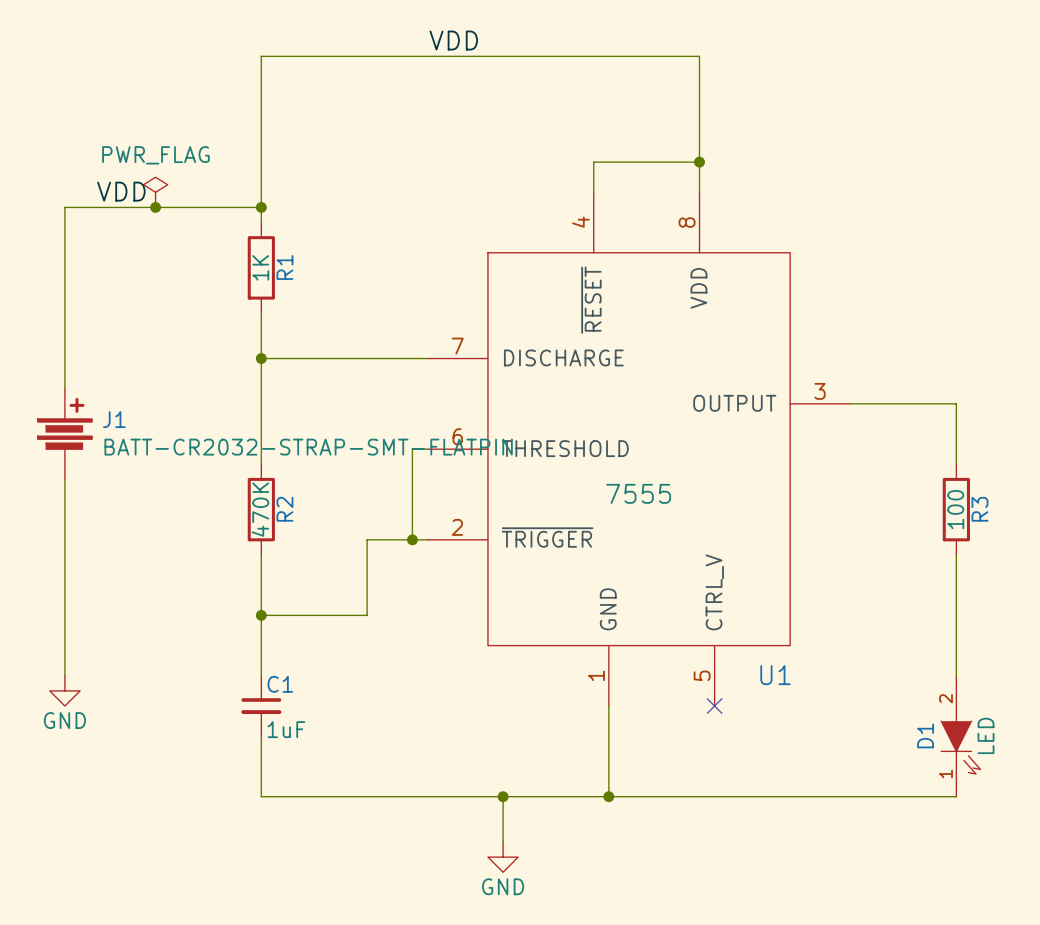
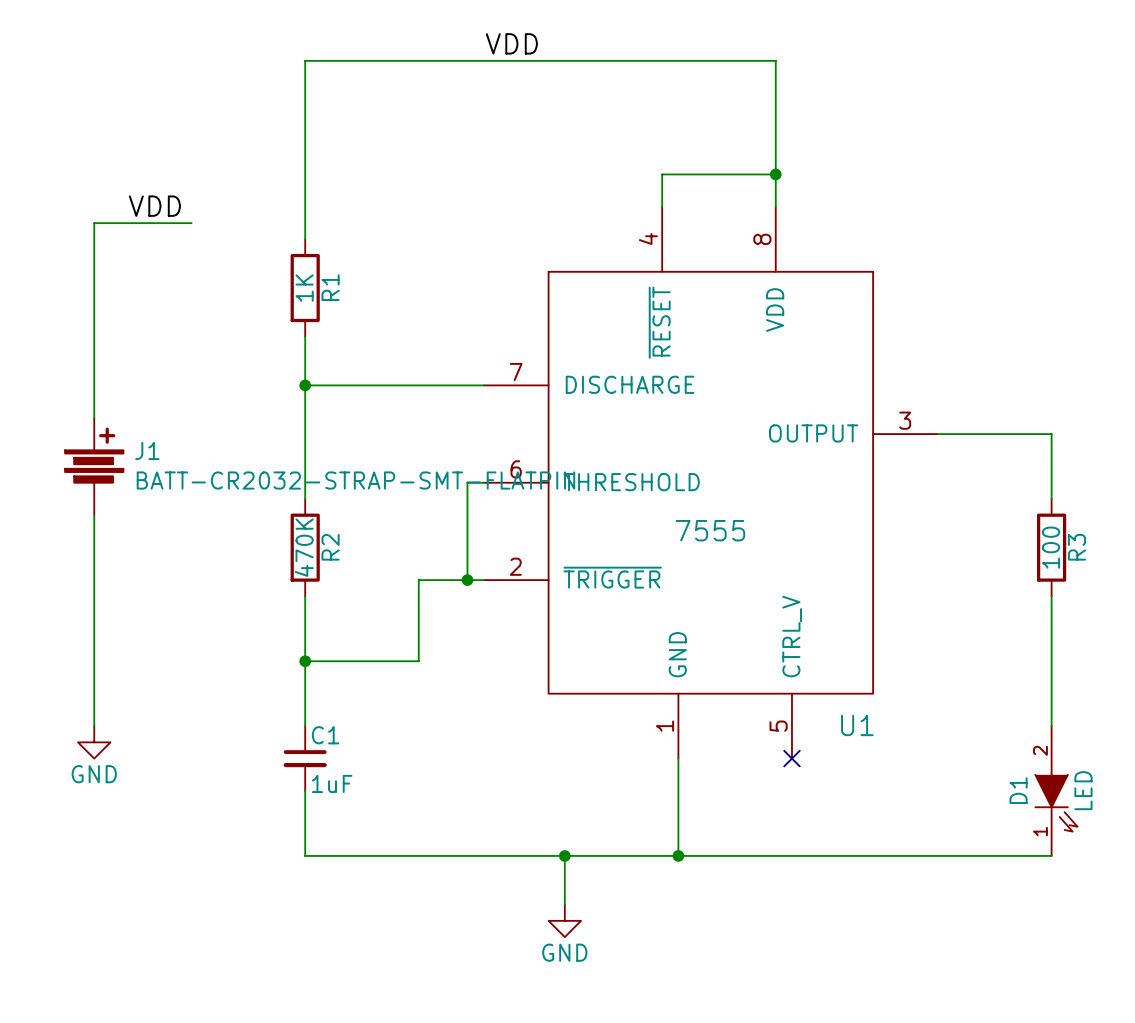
power symbol: PWR_FLAG (155, 192) -> none
wire: (155, 207) (261, 207) -> none
junction: (155, 207) -> none
junction: (261, 207) -> none

